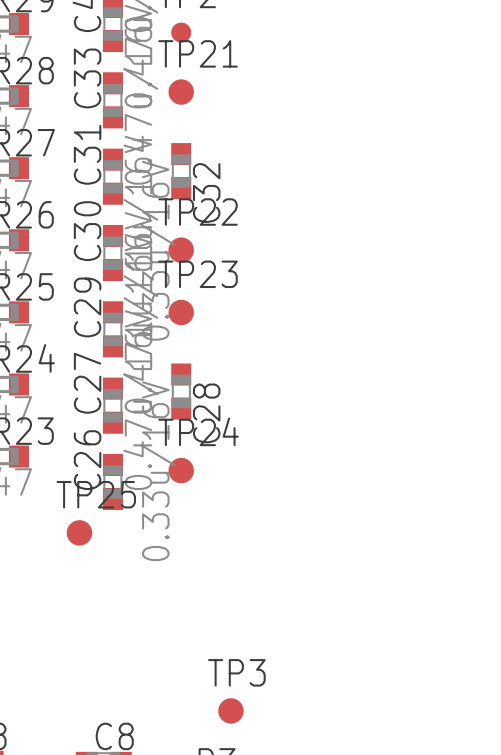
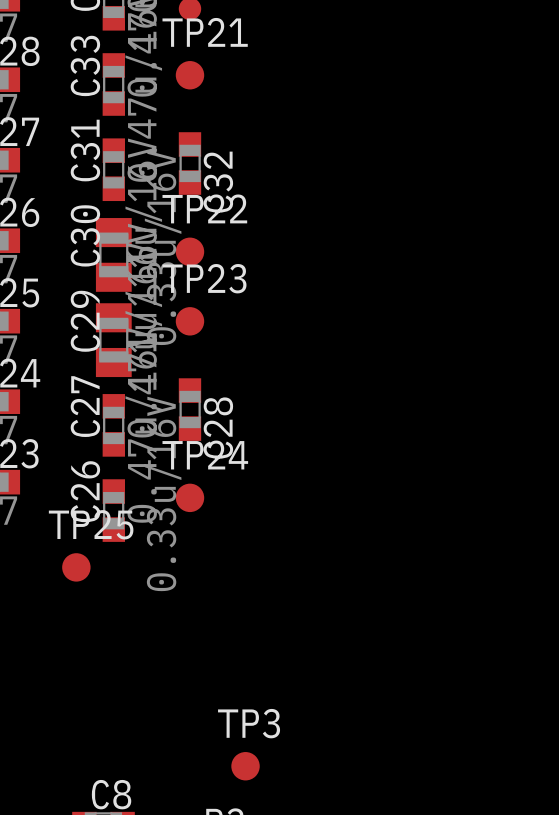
C30 footprint: [102, 224, 124, 282] -> [95, 218, 132, 292]
C29 footprint: [102, 301, 124, 358] -> [95, 303, 132, 378]

